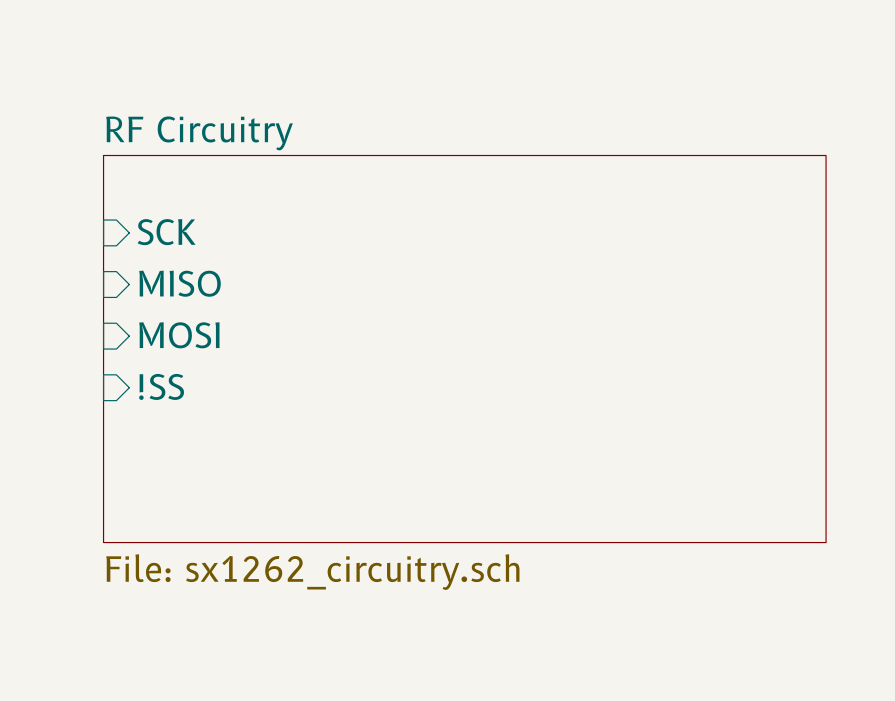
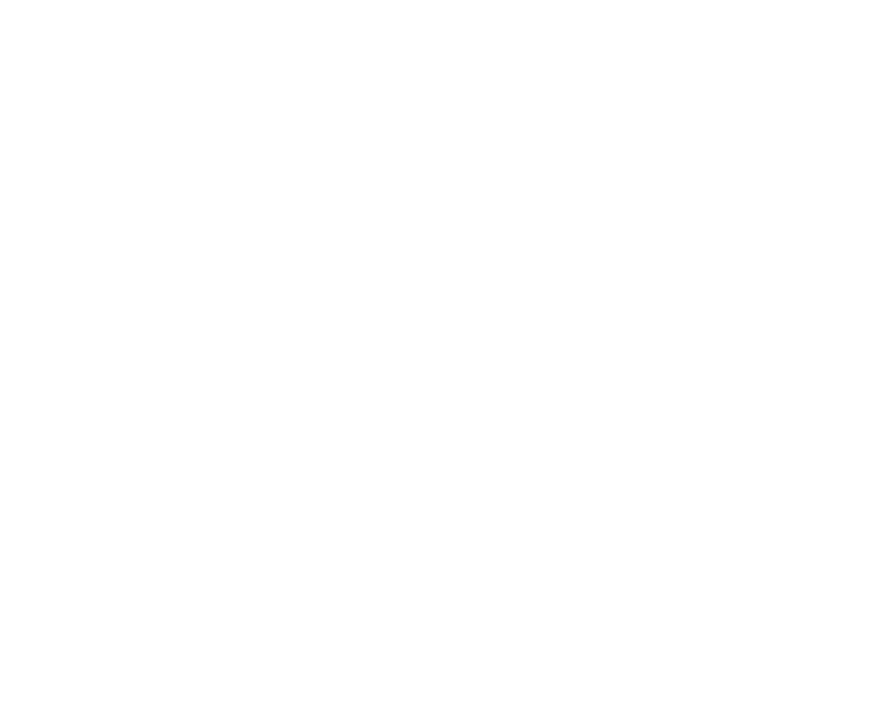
sheet pin: SCK (166, 232) -> none
sheet pin: MISO (180, 283) -> none
sheet pin: MOSI (179, 335) -> none
sheet RF Circuitry: File: sx1262_circuitry.sch (464, 349) -> none
sheet pin: !SS (161, 386) -> none

